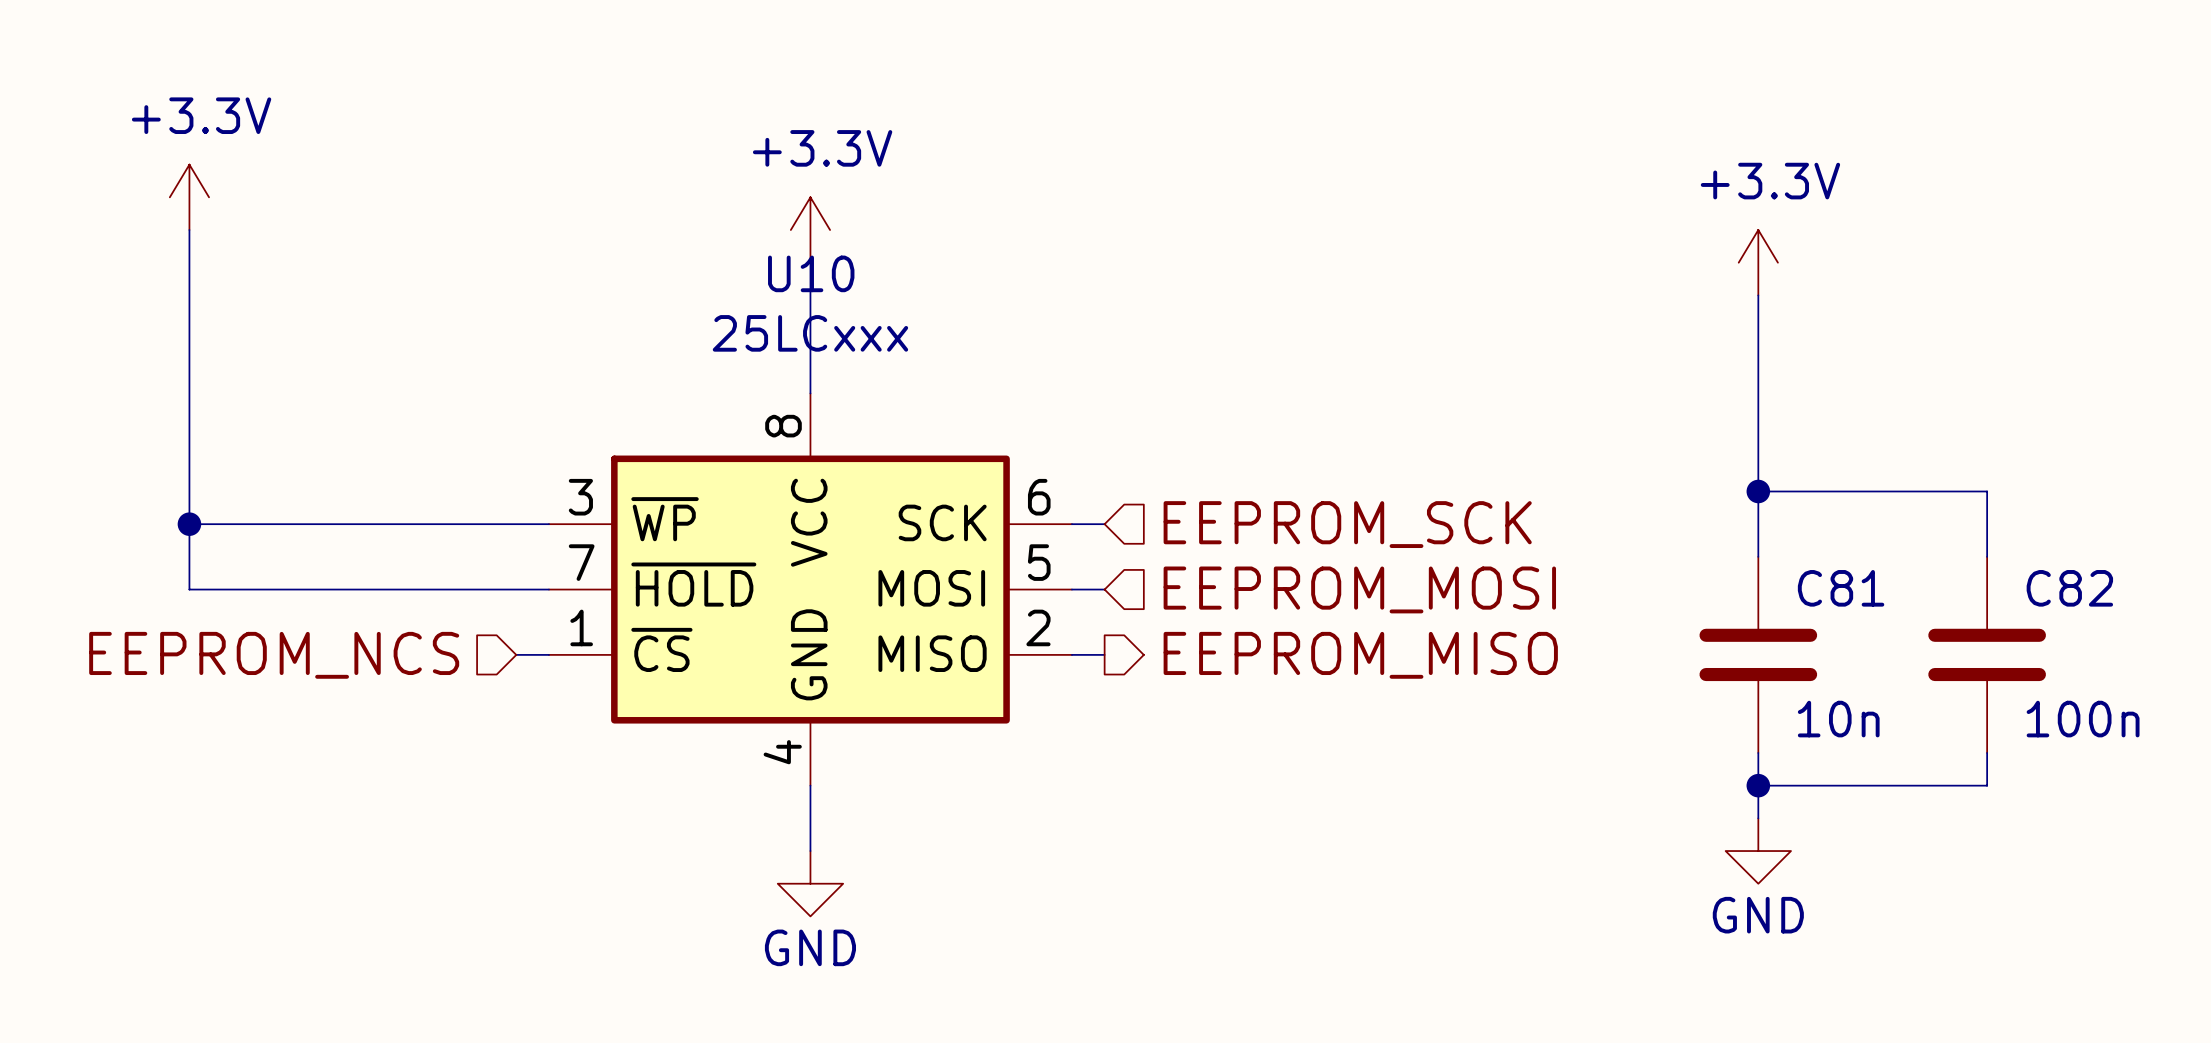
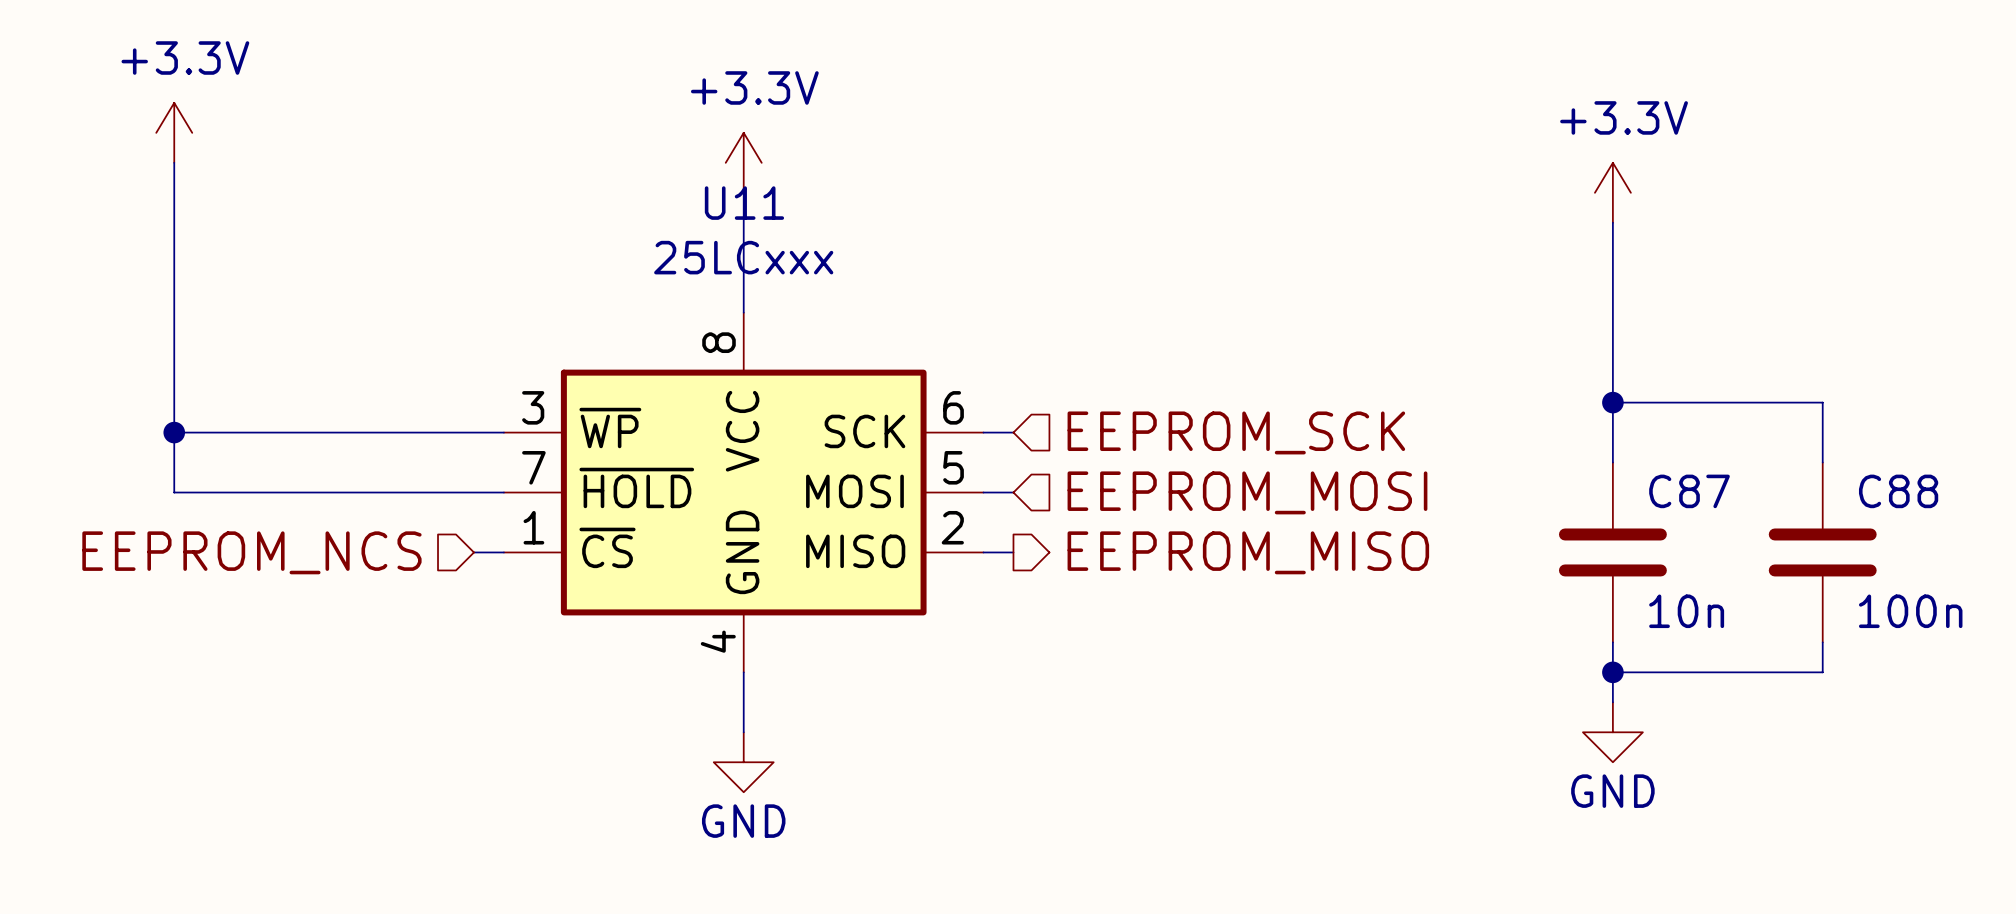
U10 name: U10 (811, 273) -> U11 (744, 203)
C81 name: C81 (1841, 588) -> C87 (1689, 491)
C82 name: C82 (2069, 588) -> C88 (1898, 491)

